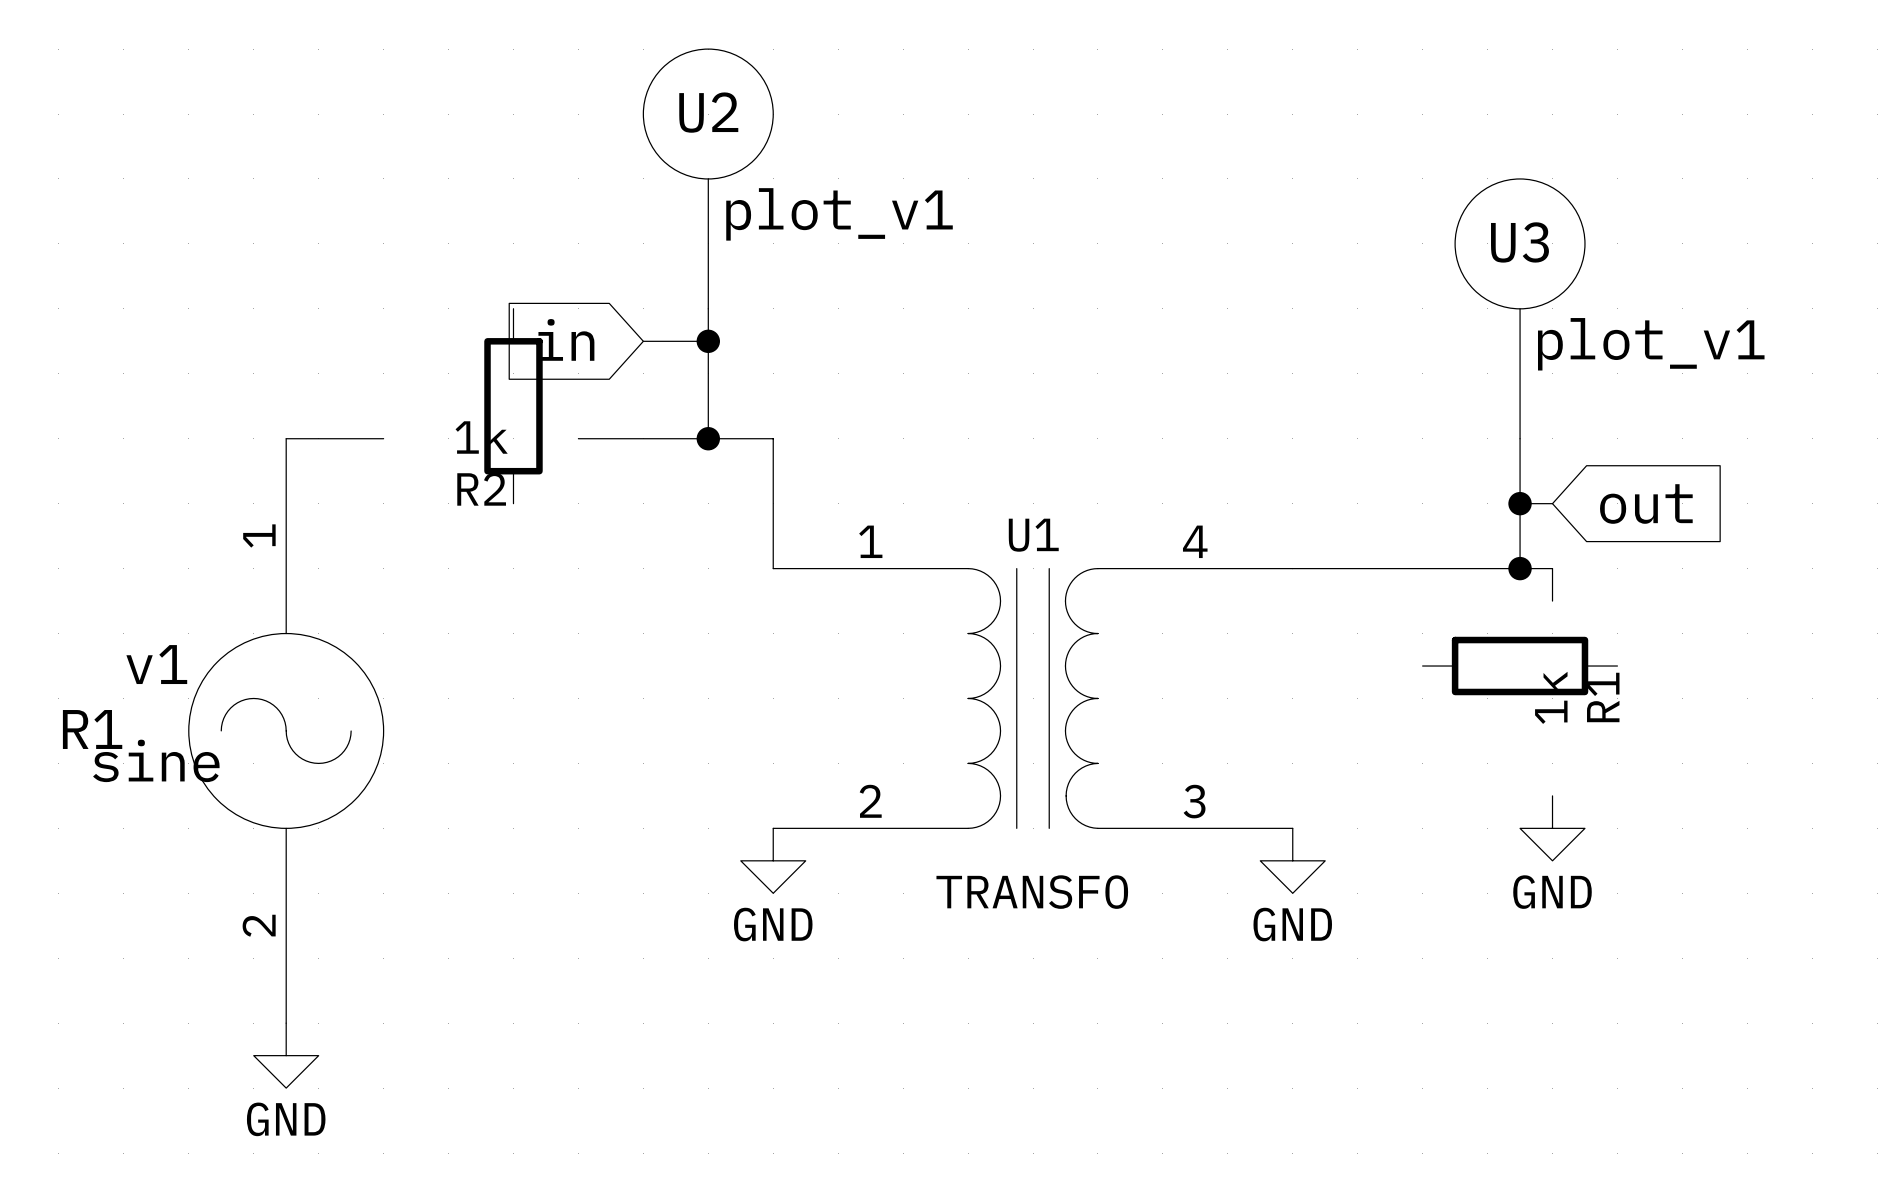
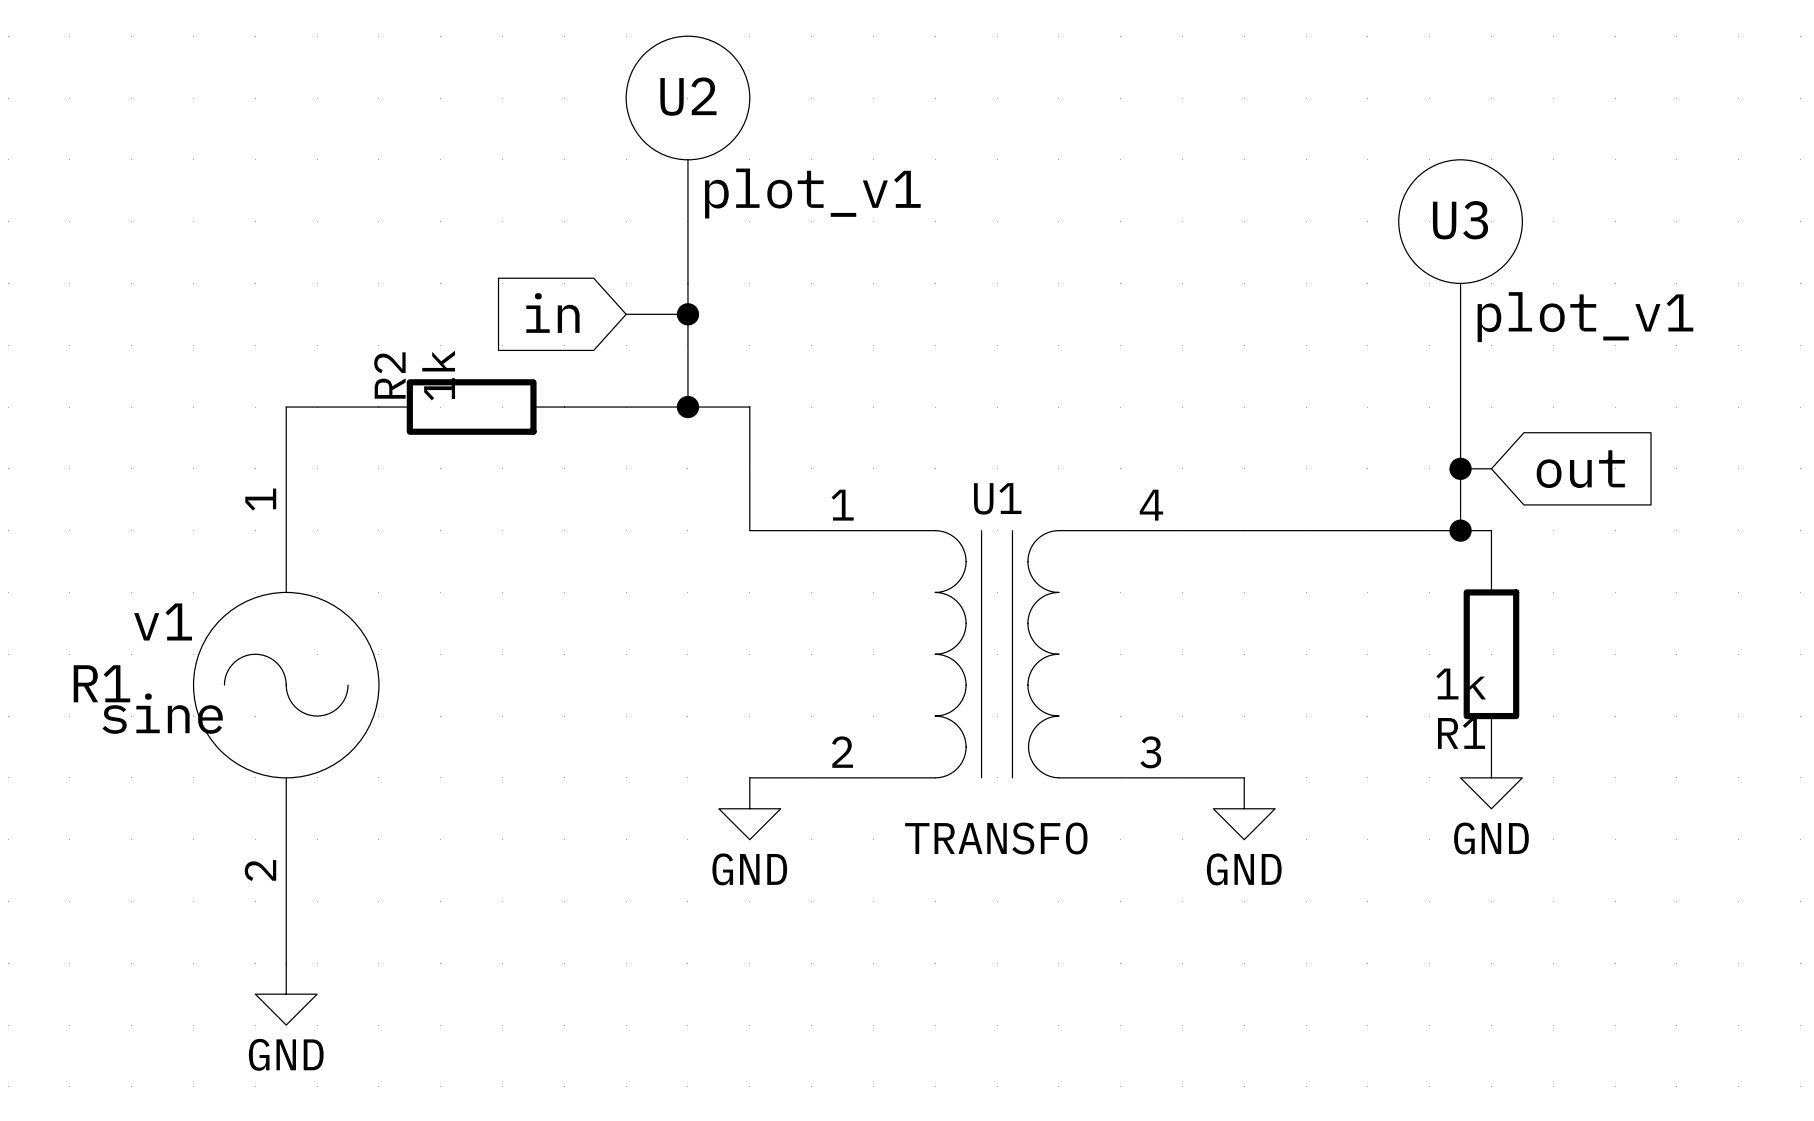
R2 rotation: 0° (513, 406) -> 90° clockwise (471, 407)
R1 rotation: 0° (1520, 666) -> 90° clockwise (1491, 654)

